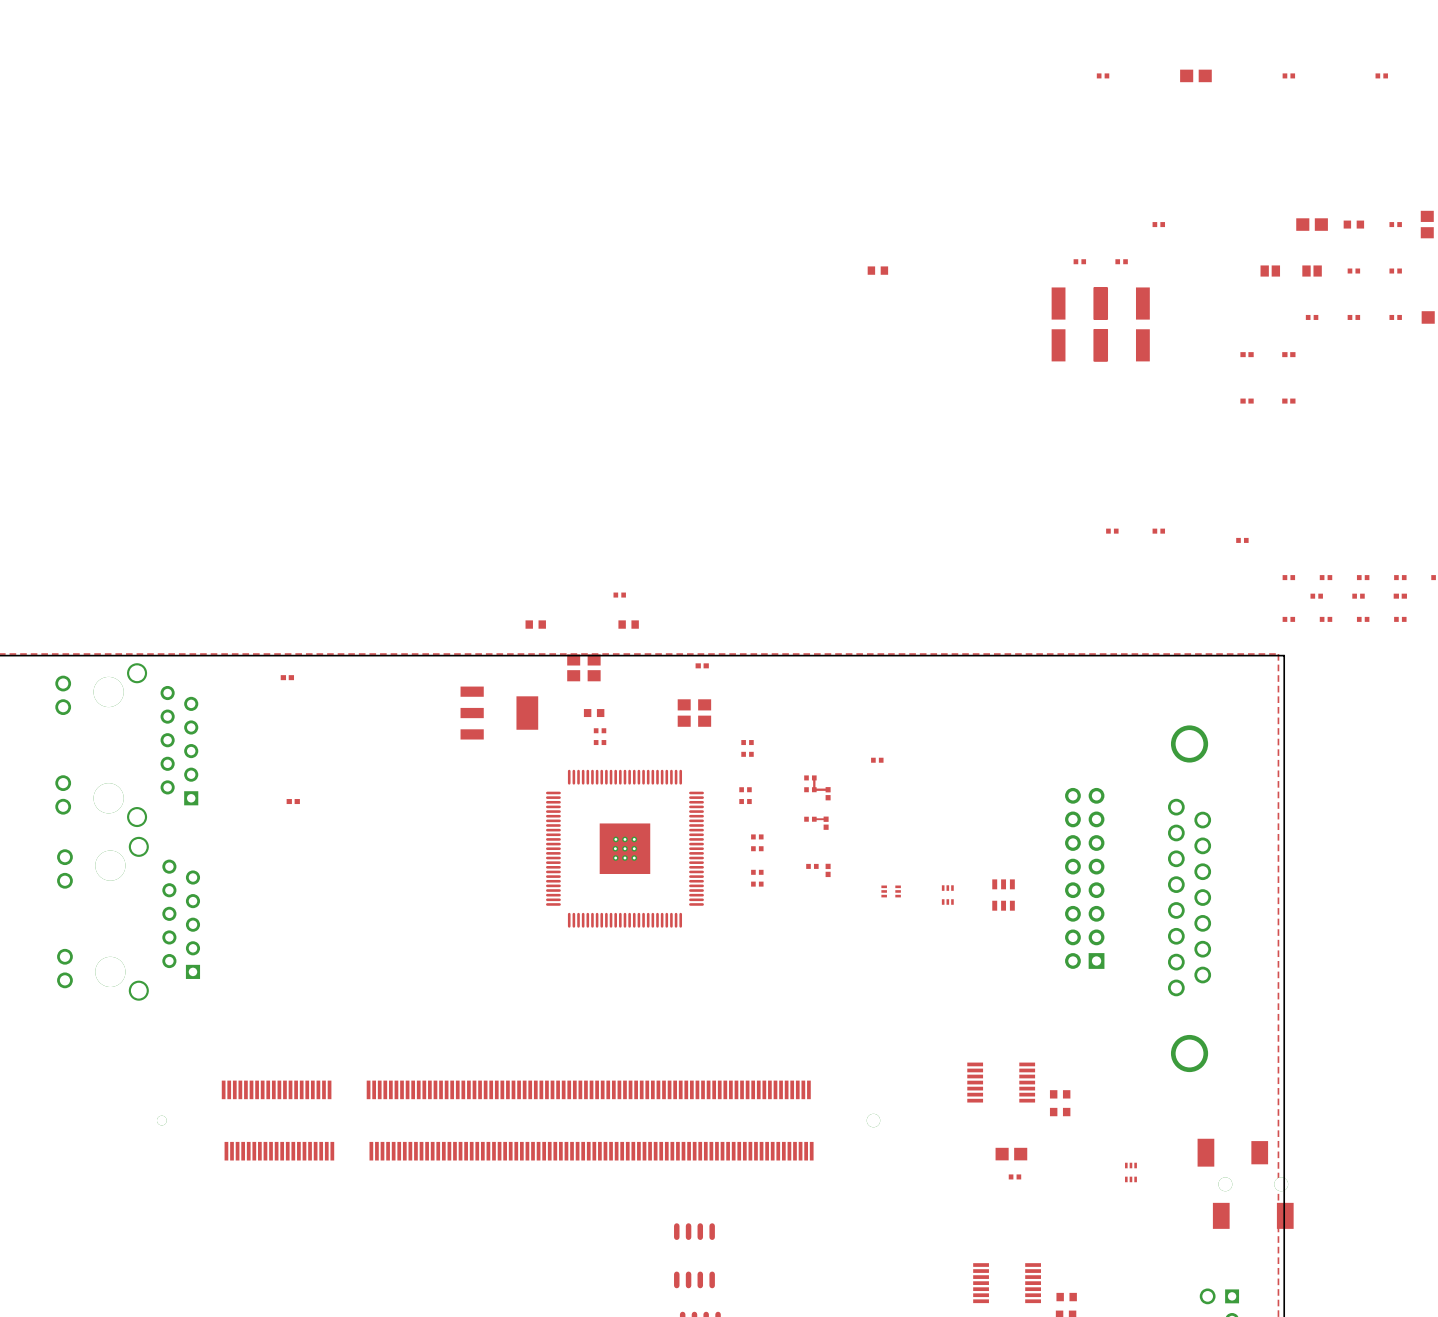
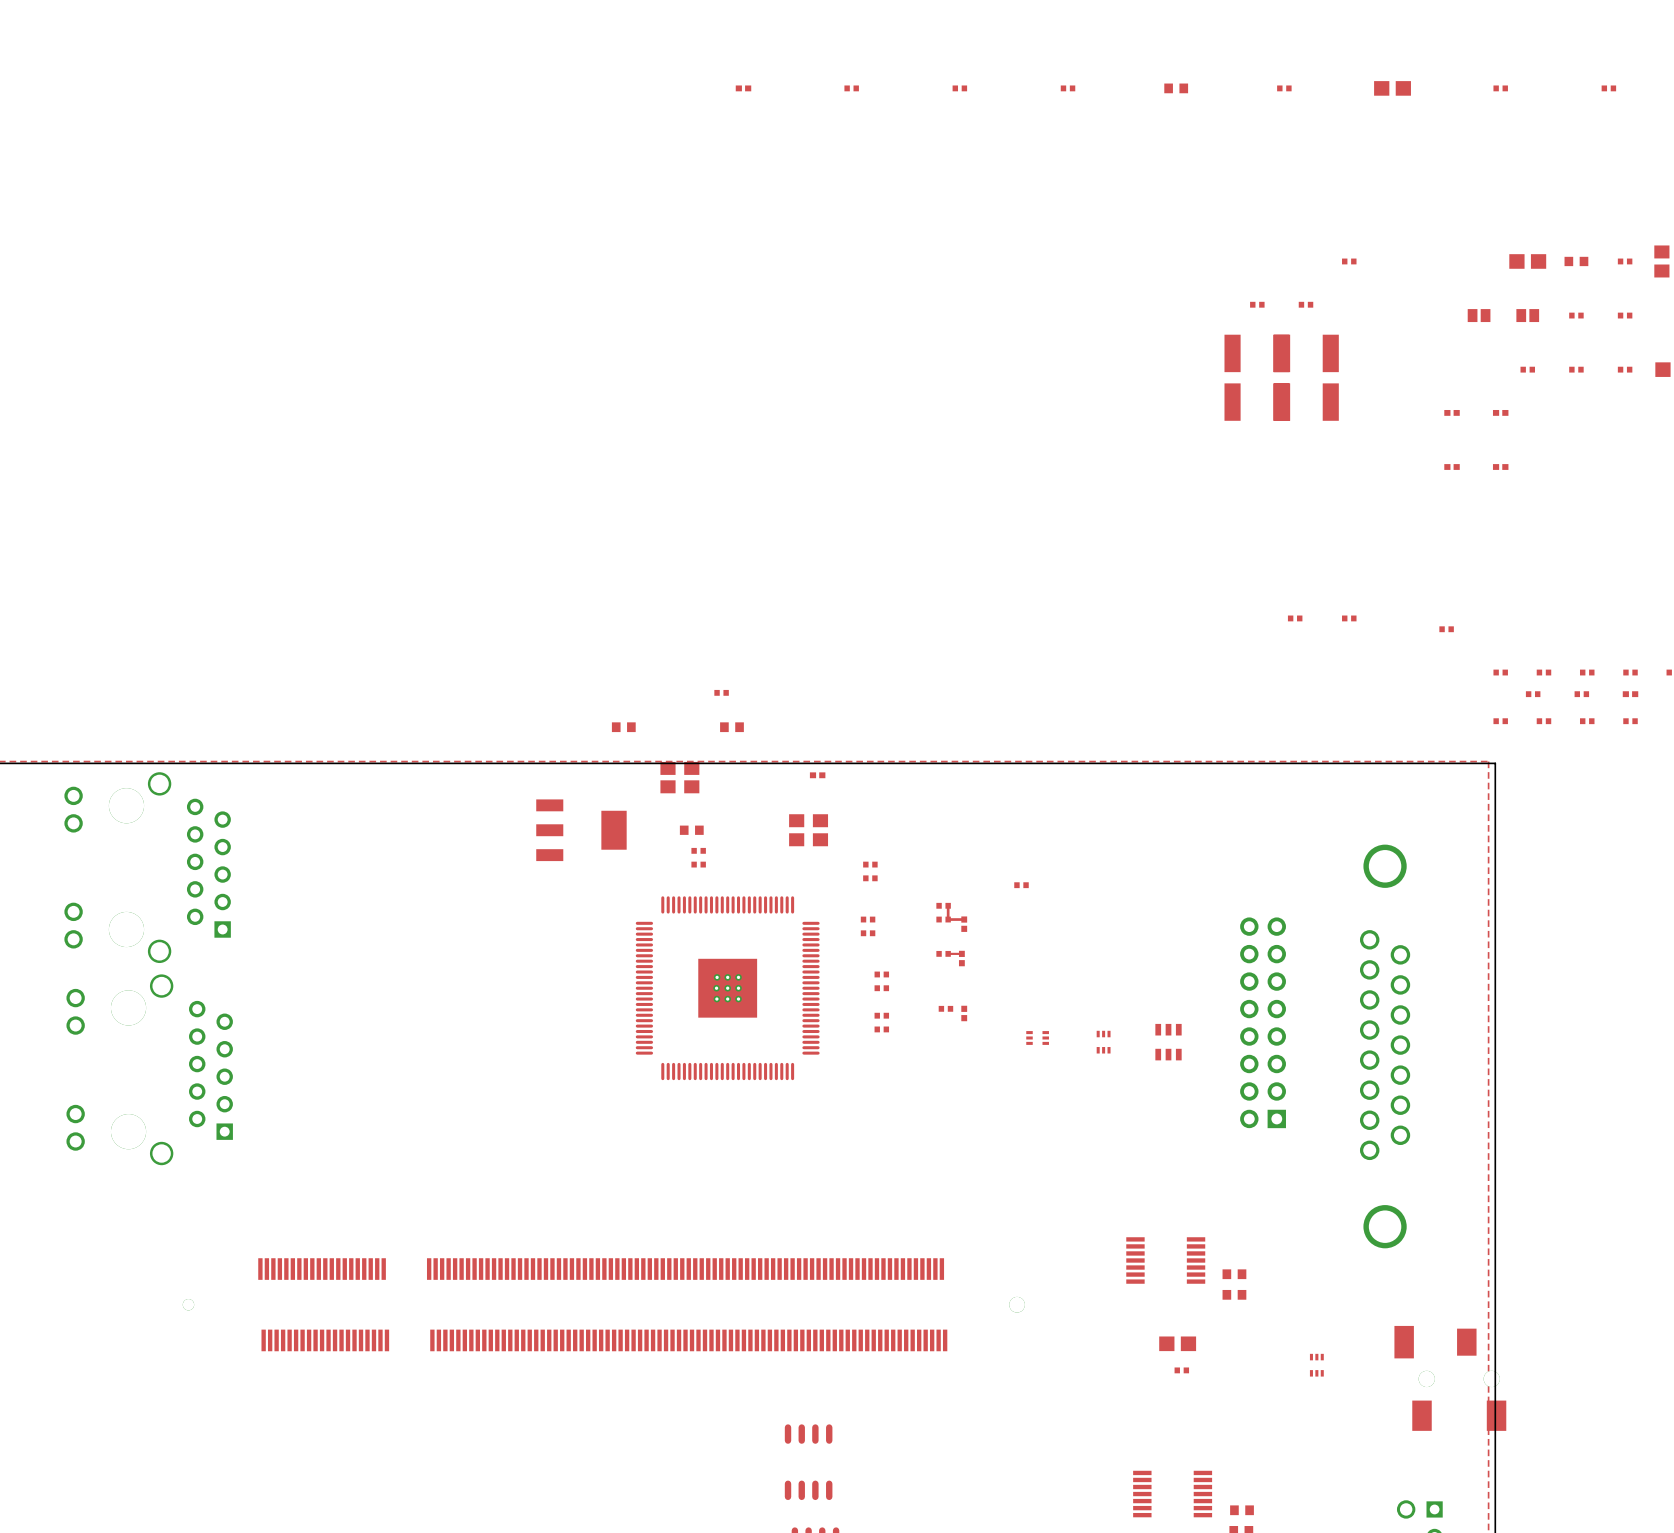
part: none -> (743, 88)
part: none -> (851, 88)
part: none -> (959, 88)
part: none -> (1068, 88)
part: none -> (1176, 88)
part: (877, 270) -> none
part: (287, 677) -> none
part: (293, 801) -> none

